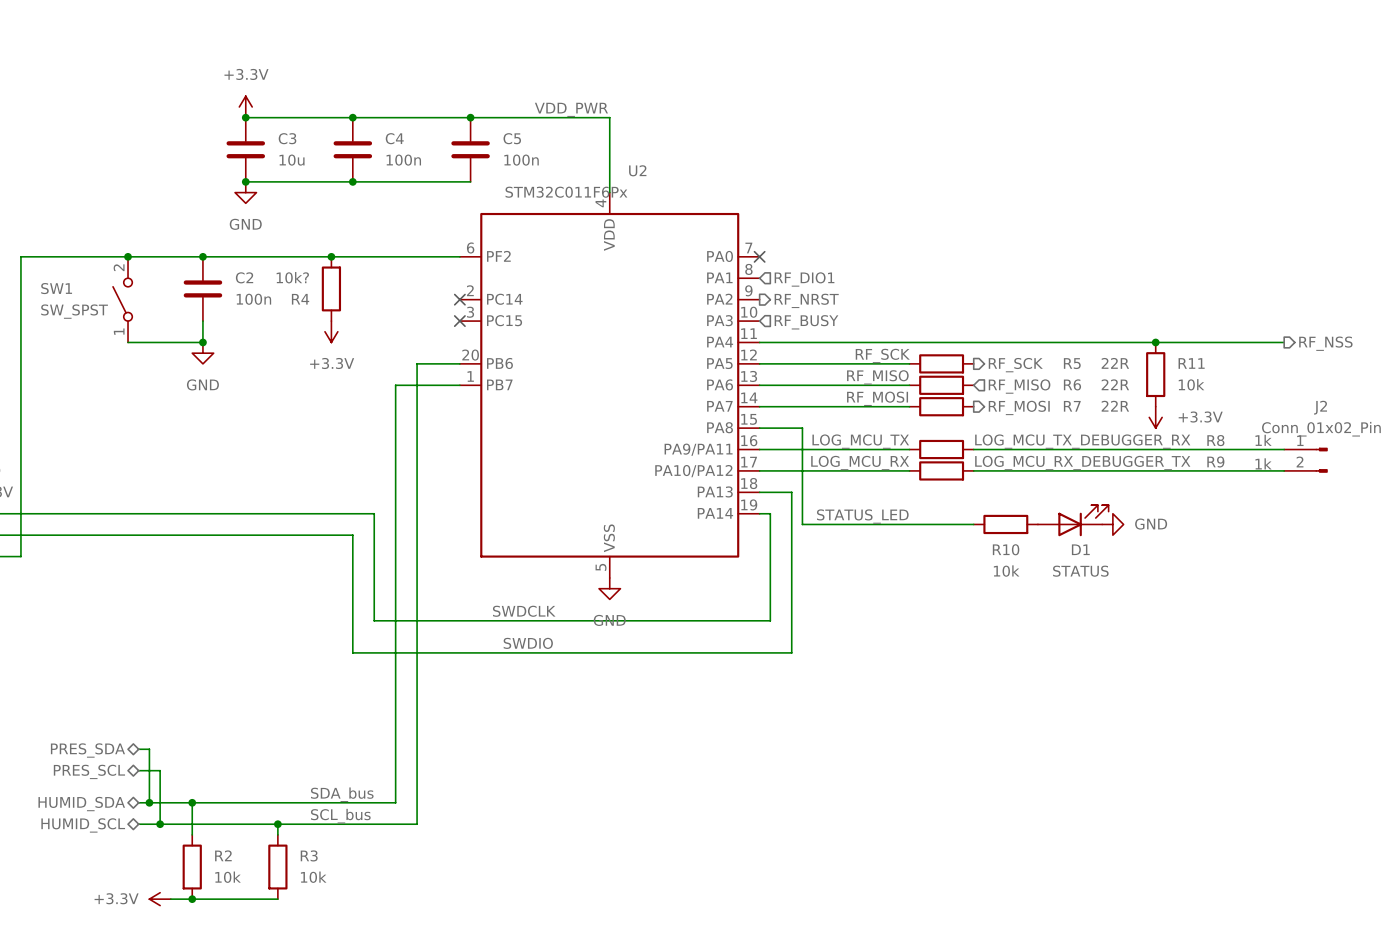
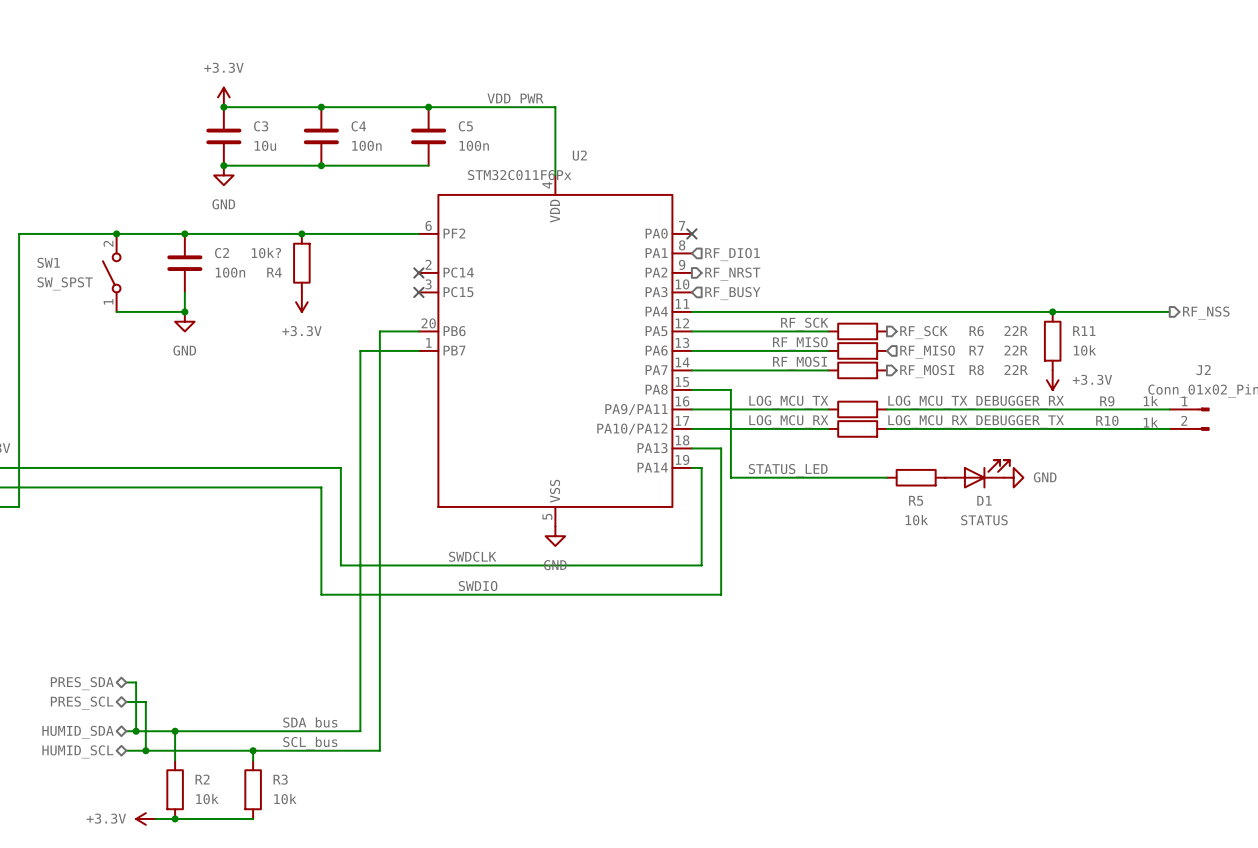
R5 name: R5 (1072, 363) -> R6 (976, 331)
R6 name: R6 (1072, 384) -> R7 (976, 350)
R7 name: R7 (1072, 406) -> R8 (976, 370)
R8 name: R8 (1215, 440) -> R9 (1107, 401)
R9 name: R9 (1215, 461) -> R10 (1107, 420)
R10 name: R10 (1006, 549) -> R5 (916, 500)

